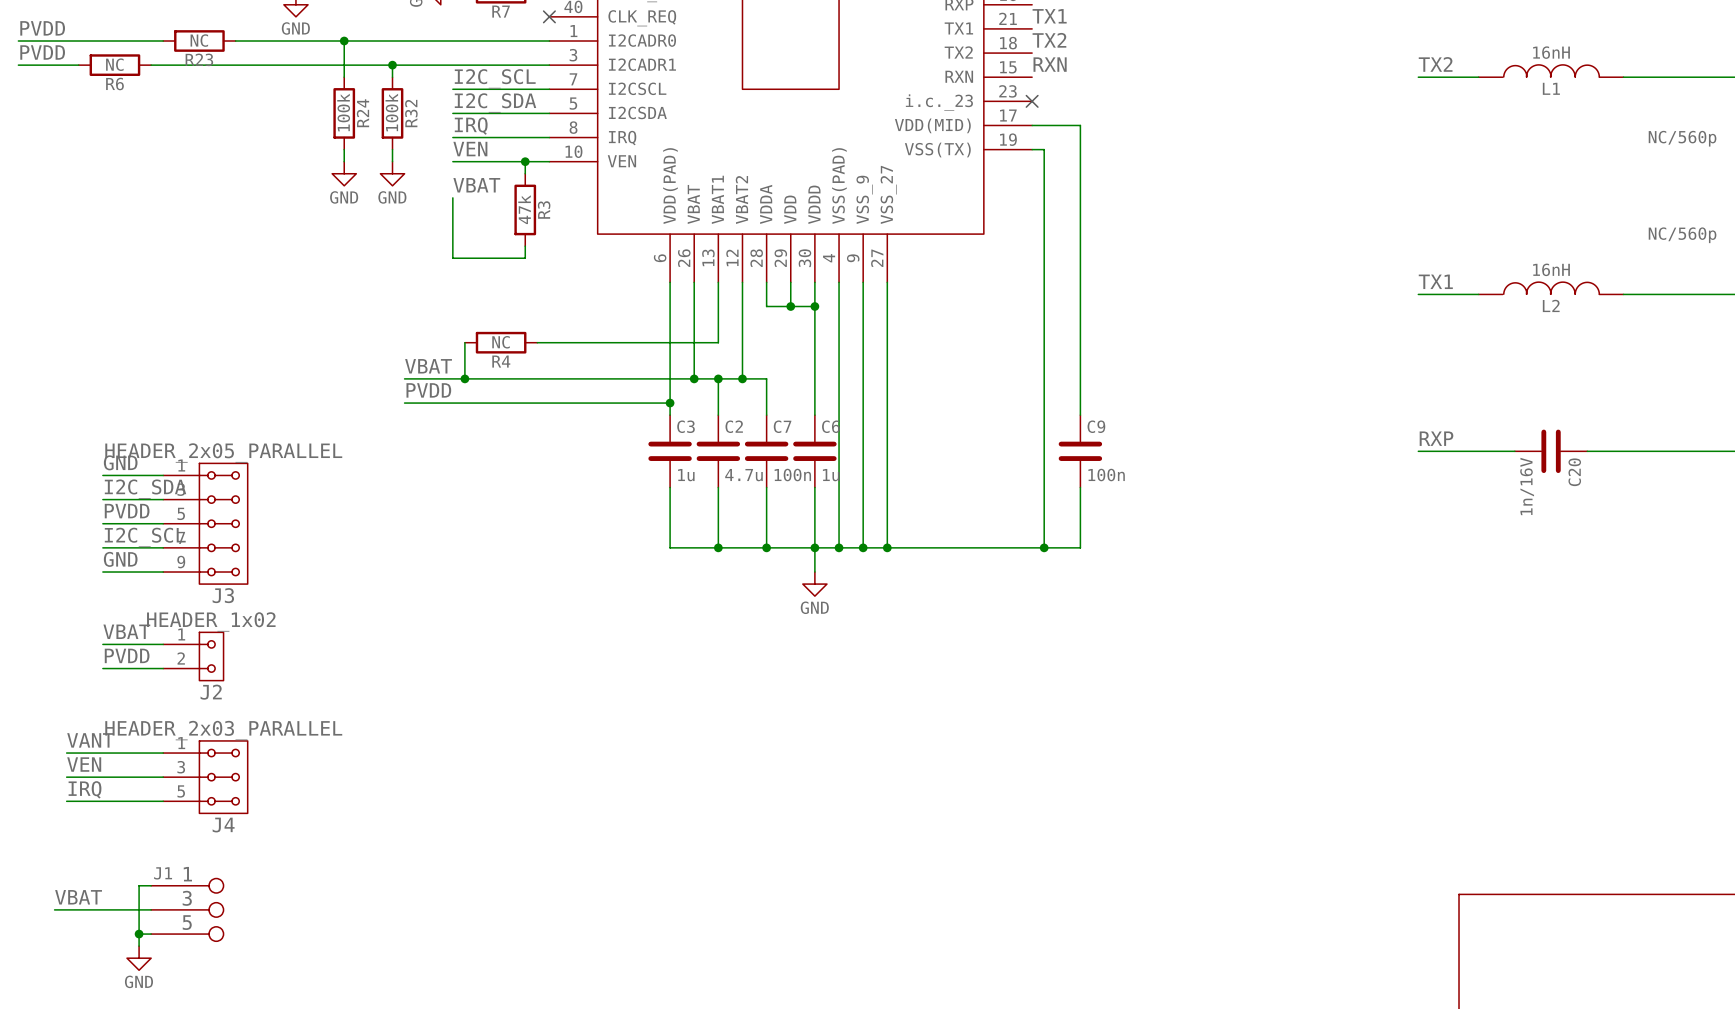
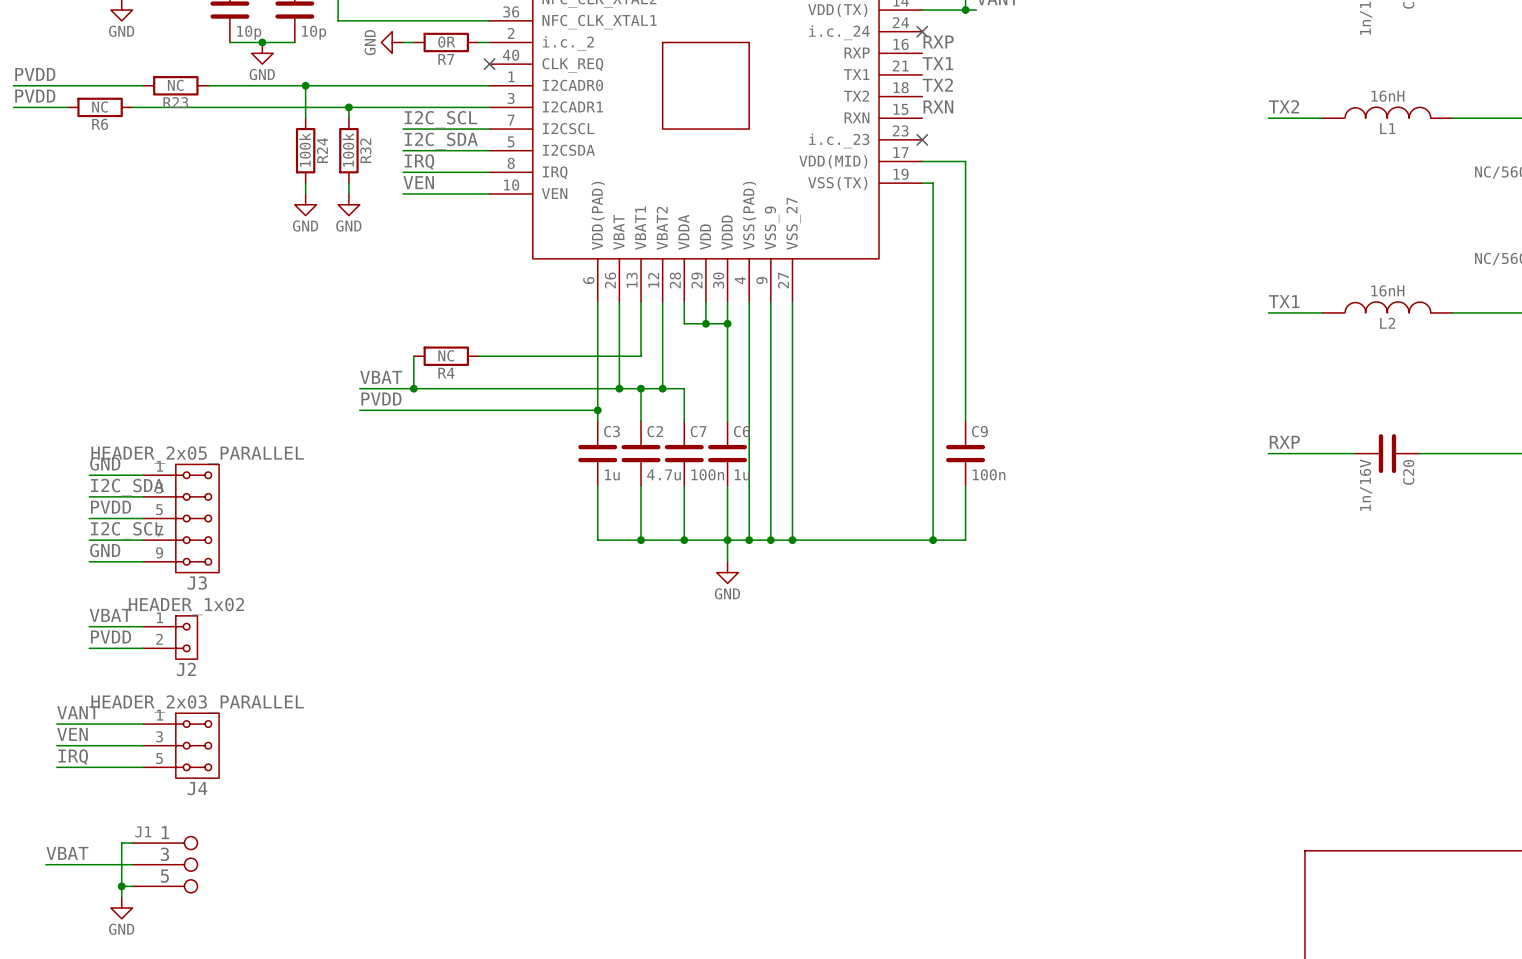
wire: (525, 161) (525, 173) -> none
junction: (525, 161) -> none
label: VBAT (476, 185) -> none
wire: (452, 197) (452, 258) (525, 258) (525, 246) -> none
R3: 47k (525, 209) -> none

